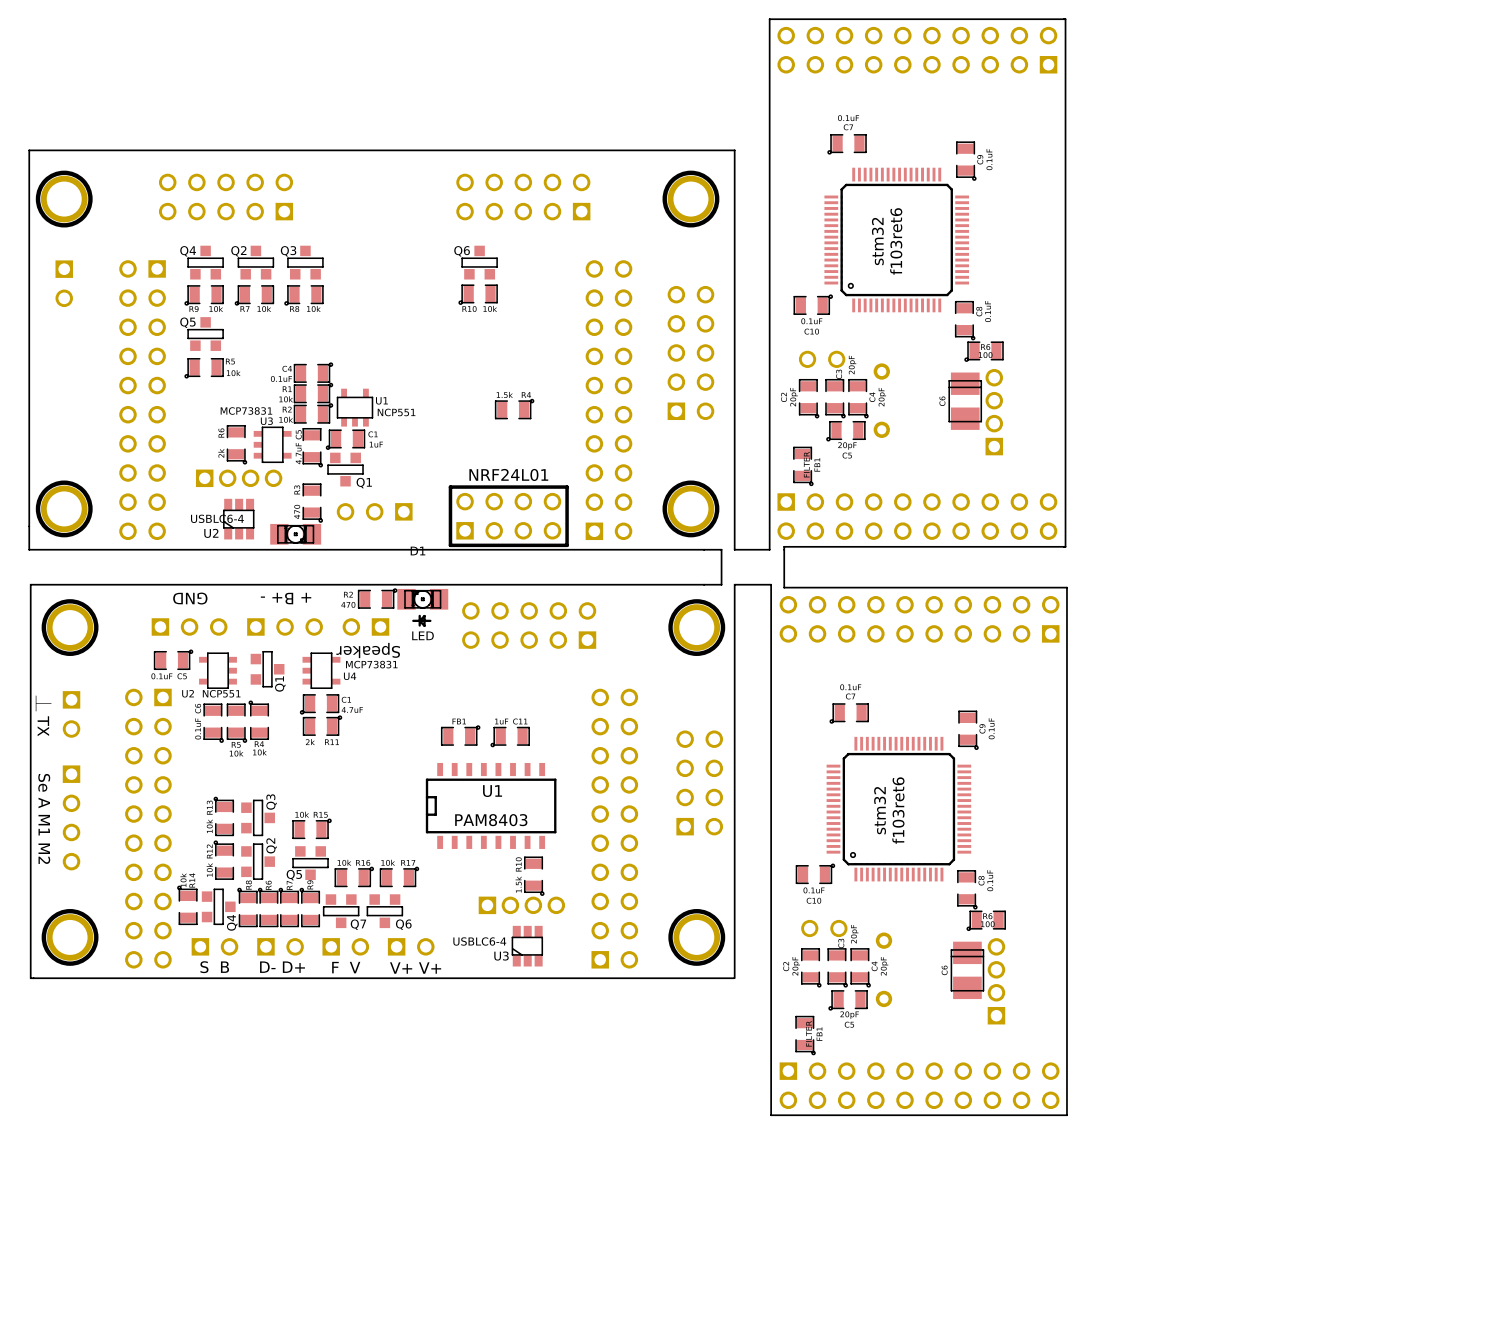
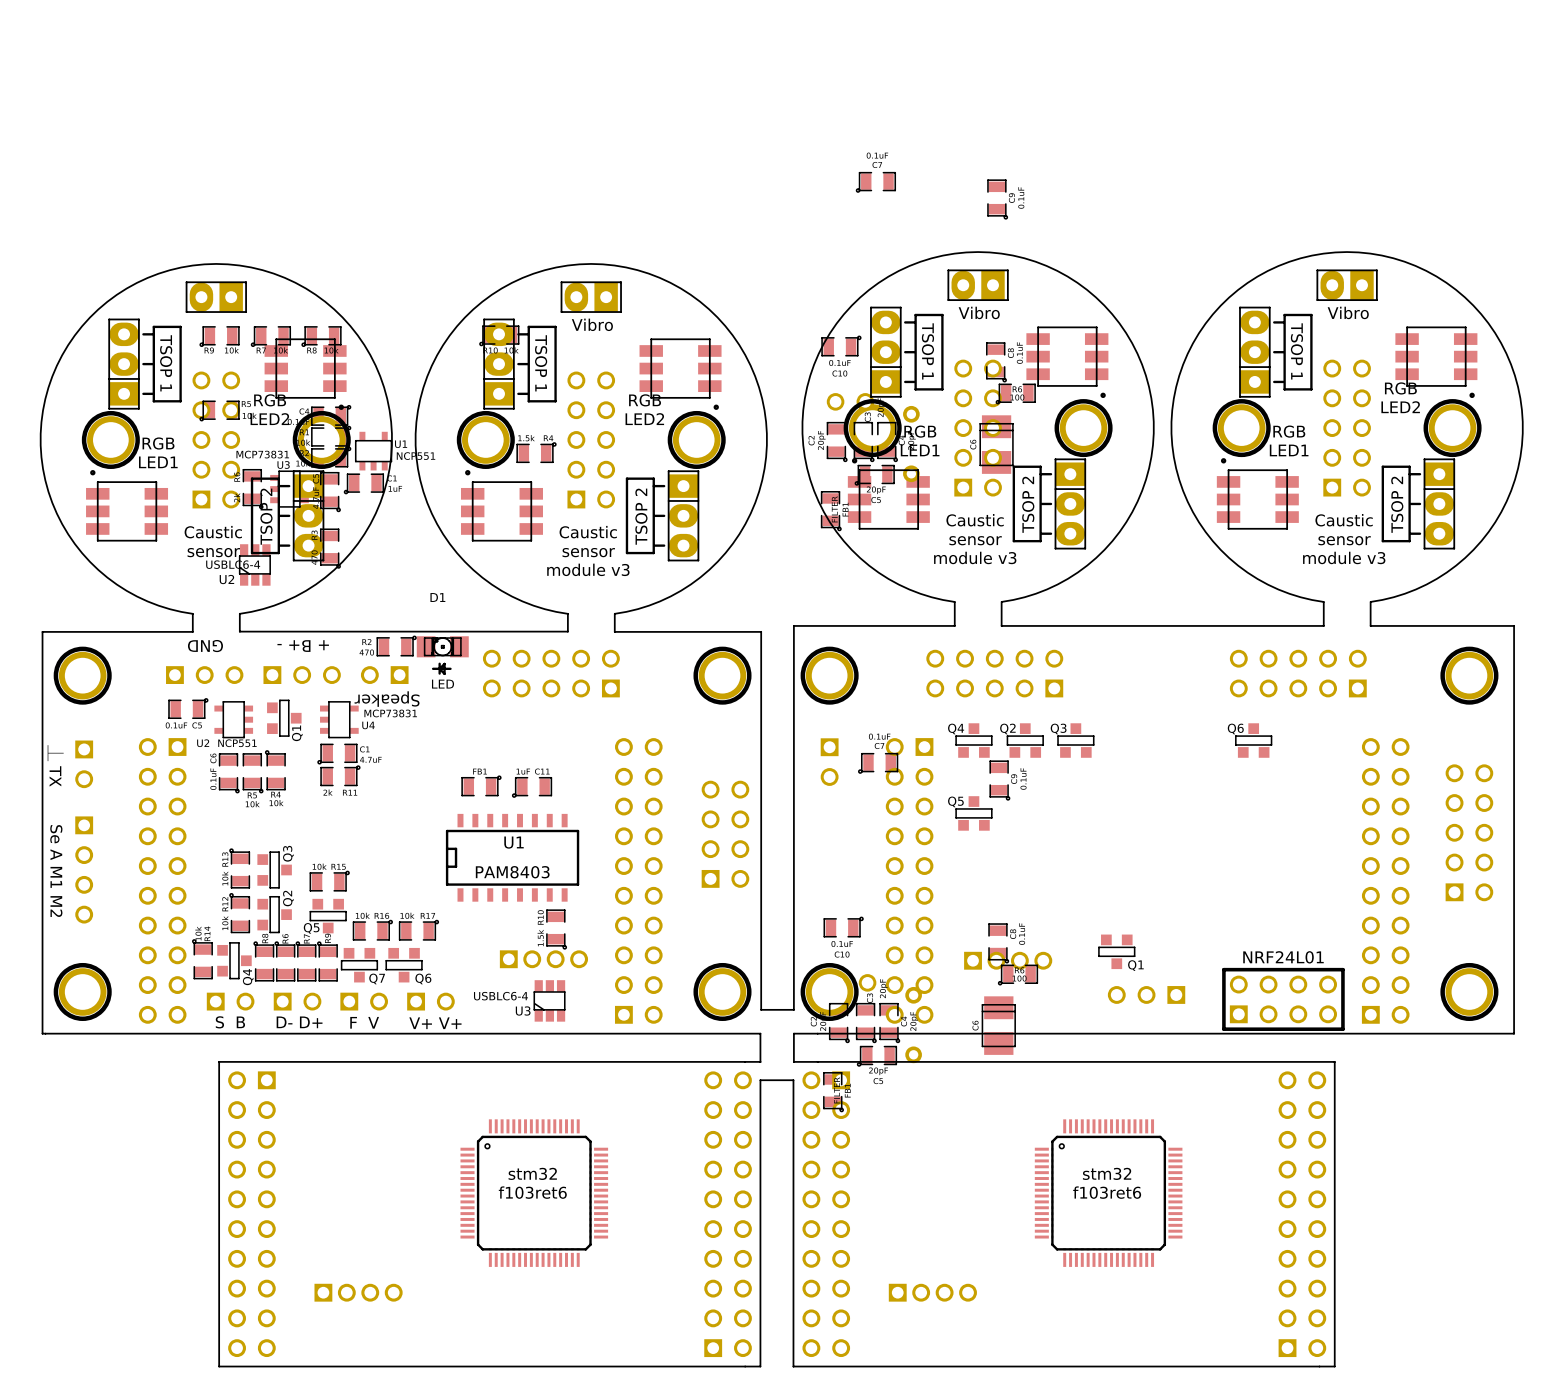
part: (917, 50) -> none
part: (226, 197) -> none
part: (523, 197) -> none
part: (64, 199) -> none
part: (690, 199) -> none
part: (896, 240) -> none
text: stm32 (877, 241) -> none
text: f103ret6 (896, 241) -> none
part: none -> (978, 285)
part: none -> (1347, 285)
part: none -> (216, 297)
part: none -> (591, 297)
Q4: (205, 262) -> none
Q2: (255, 262) -> none
Q3: (305, 262) -> none
Q6: (479, 262) -> none
text: none -> Vibro (979, 312)
text: none -> Vibro (1348, 312)
line: none -> (915, 314) (915, 389) (942, 389) (942, 314) (915, 314)
line: none -> (1284, 314) (1311, 314) (1311, 389) (1284, 389) (1284, 314)
line: none -> (905, 322) (914, 322)
line: none -> (1274, 322) (1283, 322)
part: (64, 283) -> none
text: none -> Vibro (592, 324)
line: none -> (153, 326) (180, 326) (180, 401) (153, 401) (153, 326)
line: none -> (528, 326) (528, 401) (555, 401) (555, 326) (528, 326)
line: none -> (143, 334) (152, 334)
line: none -> (518, 334) (527, 334)
text: none -> TSOP 1 (927, 351)
text: none -> TSOP 1 (1296, 351)
part: none -> (885, 352)
line: none -> (905, 352) (914, 352)
part: none -> (1254, 352)
line: none -> (1274, 352) (1283, 352)
part: none -> (1067, 356)
part: none -> (1436, 356)
text: none -> TSOP 1 (166, 363)
text: none -> TSOP 1 (541, 363)
part: none -> (124, 364)
line: none -> (143, 364) (152, 364)
part: none -> (499, 364)
line: none -> (518, 364) (527, 364)
part: none -> (305, 368)
part: none -> (680, 368)
Q5: (205, 334) -> none
line: none -> (905, 381) (914, 381)
line: none -> (1274, 381) (1283, 381)
text: none -> RGB (1400, 388)
drawing: none -> [1100, 392, 1106, 399]
drawing: none -> [1469, 392, 1475, 399]
line: none -> (143, 393) (152, 393)
line: none -> (518, 393) (527, 393)
part: (690, 352) -> none
text: none -> RGB (270, 400)
text: none -> RGB (645, 400)
drawing: none -> [338, 404, 344, 410]
drawing: none -> [713, 404, 719, 410]
text: none -> LED2 (1400, 407)
text: none -> LED2 (269, 419)
text: none -> LED2 (644, 419)
part: none -> (872, 428)
part: none -> (978, 428)
part: none -> (1083, 428)
part: none -> (1241, 428)
part: none -> (1347, 428)
part: none -> (1452, 428)
text: none -> RGB (920, 431)
text: none -> RGB (1289, 431)
part: none -> (110, 439)
part: none -> (216, 439)
part: none -> (321, 439)
part: none -> (485, 439)
part: none -> (591, 439)
part: none -> (696, 439)
part: (142, 400) -> none
text: none -> RGB (158, 443)
part: (608, 400) -> none
text: none -> LED1 (920, 450)
text: none -> LED1 (1289, 450)
part: (994, 412) -> none
drawing: none -> [851, 458, 858, 464]
drawing: none -> [1220, 458, 1227, 464]
text: none -> LED1 (158, 462)
line: none -> (1013, 466) (1013, 541) (1040, 541) (1040, 466) (1013, 466)
line: none -> (1382, 466) (1409, 466) (1409, 541) (1382, 541) (1382, 466)
drawing: none -> [90, 470, 96, 476]
drawing: none -> [465, 470, 471, 476]
line: none -> (1040, 474) (1051, 474)
line: none -> (1409, 474) (1420, 474)
line: none -> (252, 478) (278, 478) (278, 553) (252, 553) (252, 478)
line: none -> (626, 478) (626, 553) (653, 553) (653, 478) (626, 478)
line: none -> (278, 486) (289, 486)
line: none -> (653, 486) (664, 486)
part: none -> (888, 499)
part: none -> (1257, 499)
line: none -> (1042, 503) (1051, 503)
part: none -> (1070, 503)
line: none -> (1411, 503) (1420, 503)
part: none -> (1439, 503)
text: none -> TSOP 2 (1028, 504)
text: none -> TSOP 2 (1397, 504)
part: none -> (127, 511)
part: none -> (501, 511)
Q1: (345, 469) -> none
text: none -> TSOP 2 (266, 516)
line: none -> (280, 515) (289, 515)
part: none -> (308, 515)
text: none -> TSOP 2 (641, 516)
line: none -> (655, 515) (664, 515)
part: none -> (683, 515)
text: none -> Caustic (975, 520)
text: none -> Caustic (1344, 520)
part: (239, 478) -> none
text: none -> Caustic (213, 532)
text: none -> Caustic (588, 532)
line: none -> (1042, 533) (1051, 533)
line: none -> (1411, 533) (1420, 533)
text: none -> sensor (975, 540)
text: none -> sensor (1344, 540)
line: none -> (280, 545) (289, 545)
line: none -> (655, 545) (664, 545)
text: none -> sensor (213, 552)
text: none -> sensor (588, 552)
part: (64, 508) -> none
part: (690, 508) -> none
part: (374, 511) -> none
text: none -> module v3 (975, 557)
text: none -> module v3 (1344, 557)
part: NRF24L01 (508, 516) -> none
part: (917, 516) -> none
text: none -> module v3 (588, 569)
part: (295, 534) -> none
board edge: none -> (954, 601) (920, 593) (888, 578) (860, 558) (843, 541) (830, 522) (814, 490) (804, 457) (802, 421) (807, 387) (818, 353) (836, 323) (860, 297) (888, 276) (920, 261) (954, 253) (978, 252) (1013, 255) (1046, 265) (1067, 276) (1095, 297) (1119, 323) (1137, 353) (1149, 386) (1153, 421) (1152, 445) (1146, 479) (1132, 512) (1112, 541) (1087, 565) (1057, 584) (1024, 597) (1001, 601)
board edge: none -> (1001, 601) (1001, 625) (1323, 625) (1323, 602)
board edge: none -> (1323, 601) (1289, 593) (1257, 578) (1229, 558) (1212, 541) (1199, 522) (1183, 490) (1173, 457) (1171, 421) (1176, 387) (1187, 353) (1205, 323) (1229, 297) (1257, 276) (1289, 261) (1323, 253) (1347, 252) (1382, 255) (1415, 265) (1446, 282) (1464, 297) (1488, 323) (1506, 353) (1518, 386) (1521, 410) (1521, 445) (1515, 479) (1501, 512) (1481, 541) (1456, 565) (1426, 584) (1393, 597) (1370, 601)
board edge: none -> (1370, 601) (1370, 625) (1514, 625) (1514, 1033) (793, 1033) (793, 1061) (1334, 1061) (1334, 1366) (793, 1366)
board edge: none -> (239, 613) (239, 631) (567, 631) (567, 613) (533, 605) (501, 590) (473, 570) (449, 543) (437, 524) (423, 491) (417, 468) (415, 433) (420, 399) (427, 376) (443, 345) (464, 317) (491, 294) (522, 277) (556, 267) (591, 263) (626, 267) (659, 277) (690, 294) (709, 309) (732, 335) (750, 365) (762, 398) (766, 433) (766, 457) (759, 491) (745, 523) (725, 552) (700, 577) (670, 596) (637, 609) (614, 613)
board edge: none -> (239, 613) (262, 609) (295, 596) (325, 577) (350, 552) (370, 523) (384, 491) (391, 457) (391, 433) (387, 398) (375, 365) (357, 335) (334, 309) (315, 294) (284, 277) (251, 267) (216, 263) (192, 265) (158, 273) (126, 288) (98, 309) (82, 326) (62, 355) (48, 387) (41, 422) (41, 457) (48, 491) (62, 524) (82, 553) (98, 570) (126, 590) (158, 605) (192, 613)
board edge: none -> (614, 613) (614, 631)
board edge: (177, 584) (591, 584) -> (192, 631) (192, 614)
board edge: (721, 584) (721, 549) (29, 549) (29, 150) (734, 150) (734, 549) (769, 549) (769, 19) (1065, 19) (1065, 546) (784, 546) (784, 587) (1066, 587) (1066, 1115) (771, 1115) (771, 584) (734, 584) -> (747, 631) (761, 631)
part: (919, 619) -> none
part: none -> (994, 673)
part: none -> (1298, 673)
part: none -> (829, 675)
part: none -> (1469, 675)
Q4: none -> (973, 740)
Q2: none -> (1025, 740)
Q3: none -> (1075, 740)
Q6: none -> (1253, 740)
part: none -> (829, 762)
Q5: none -> (973, 813)
part: none -> (1469, 832)
part: (898, 809) -> none
text: stm32 (880, 810) -> none
text: f103ret6 (898, 810) -> none
part: none -> (909, 880)
part: none -> (1385, 880)
Q1: none -> (1116, 951)
part: none -> (829, 991)
part: none -> (1469, 991)
part: none -> (1146, 994)
part: none -> NRF24L01 (1283, 999)
board edge: (734, 954) (734, 978) -> (761, 1009) (793, 1009) (793, 625) (954, 625) (954, 602)
board edge: none -> (760, 1033) (760, 1062)
part rotation: 0° (996, 981) -> 90° clockwise (1008, 960)
part position: (996, 981) -> (1008, 960)
board edge: none -> (760, 1061) (219, 1061) (219, 1366) (760, 1366)
part: (919, 1085) -> none
text: none -> stm32 (532, 1173)
text: none -> stm32 (1107, 1173)
text: none -> f103ret6 (532, 1192)
text: none -> f103ret6 (1107, 1192)
part: none -> (534, 1193)
part: none -> (1108, 1193)
part: none -> (251, 1214)
part: none -> (728, 1214)
part: none -> (826, 1214)
part: none -> (1302, 1214)
part: none -> (358, 1292)
part: none -> (932, 1292)
board edge: none -> (760, 1366) (760, 1080) (793, 1080) (793, 1366)

